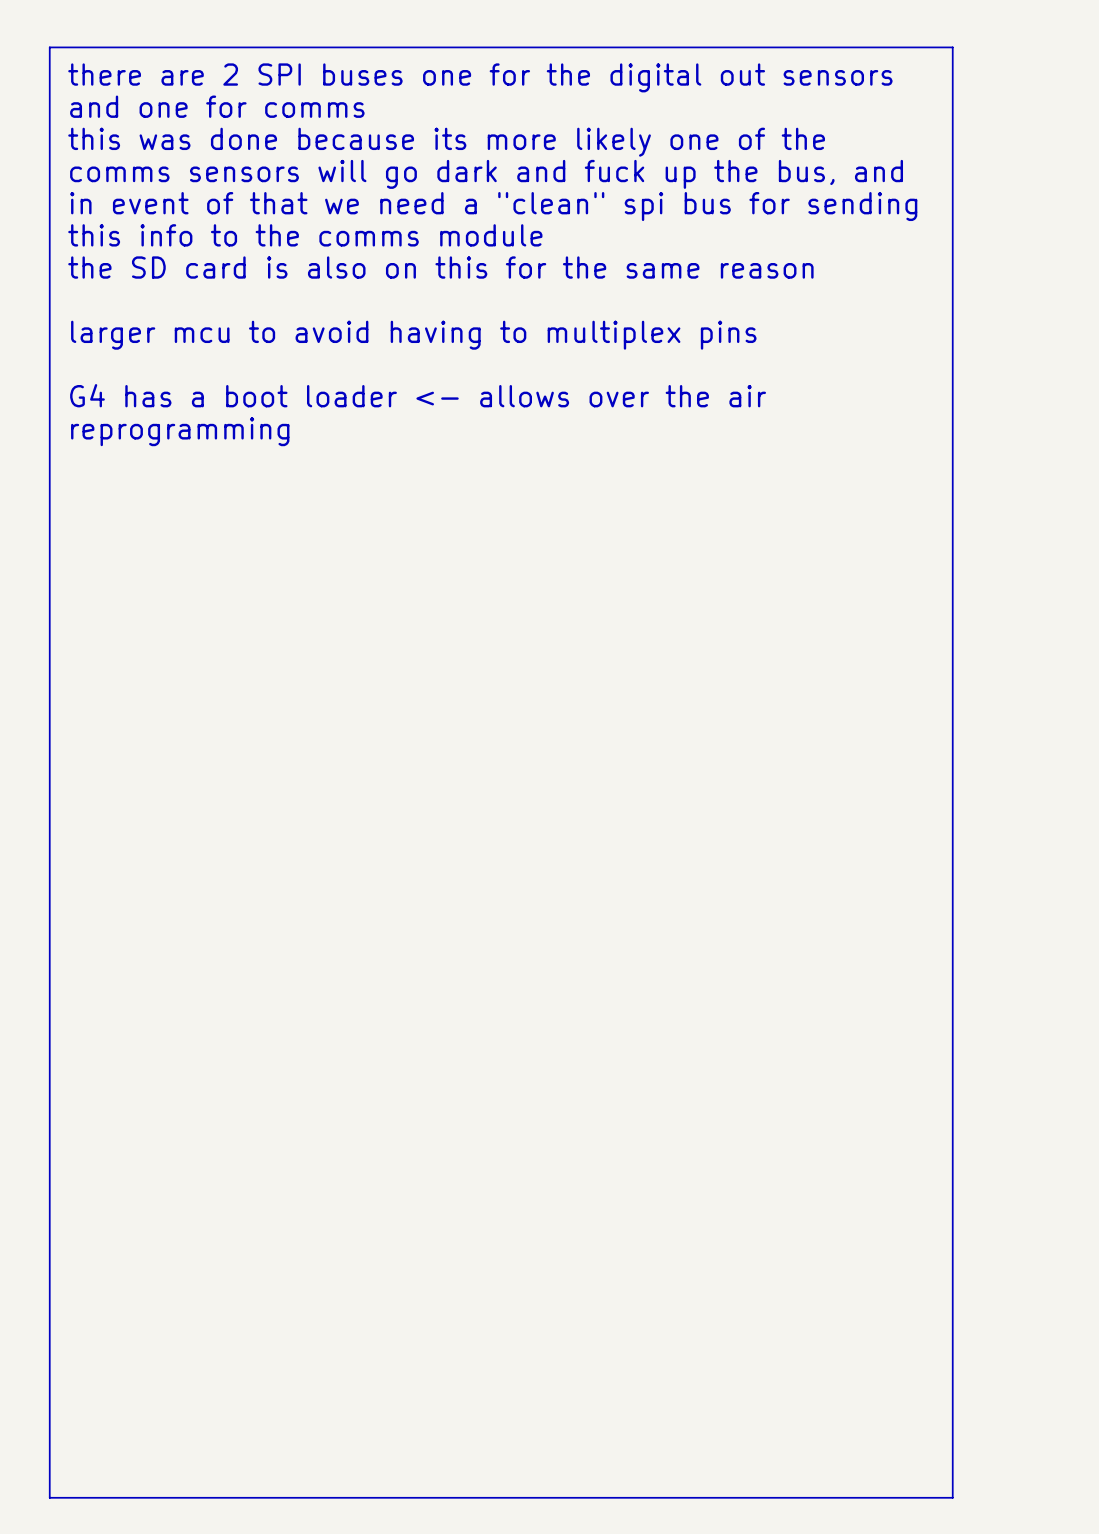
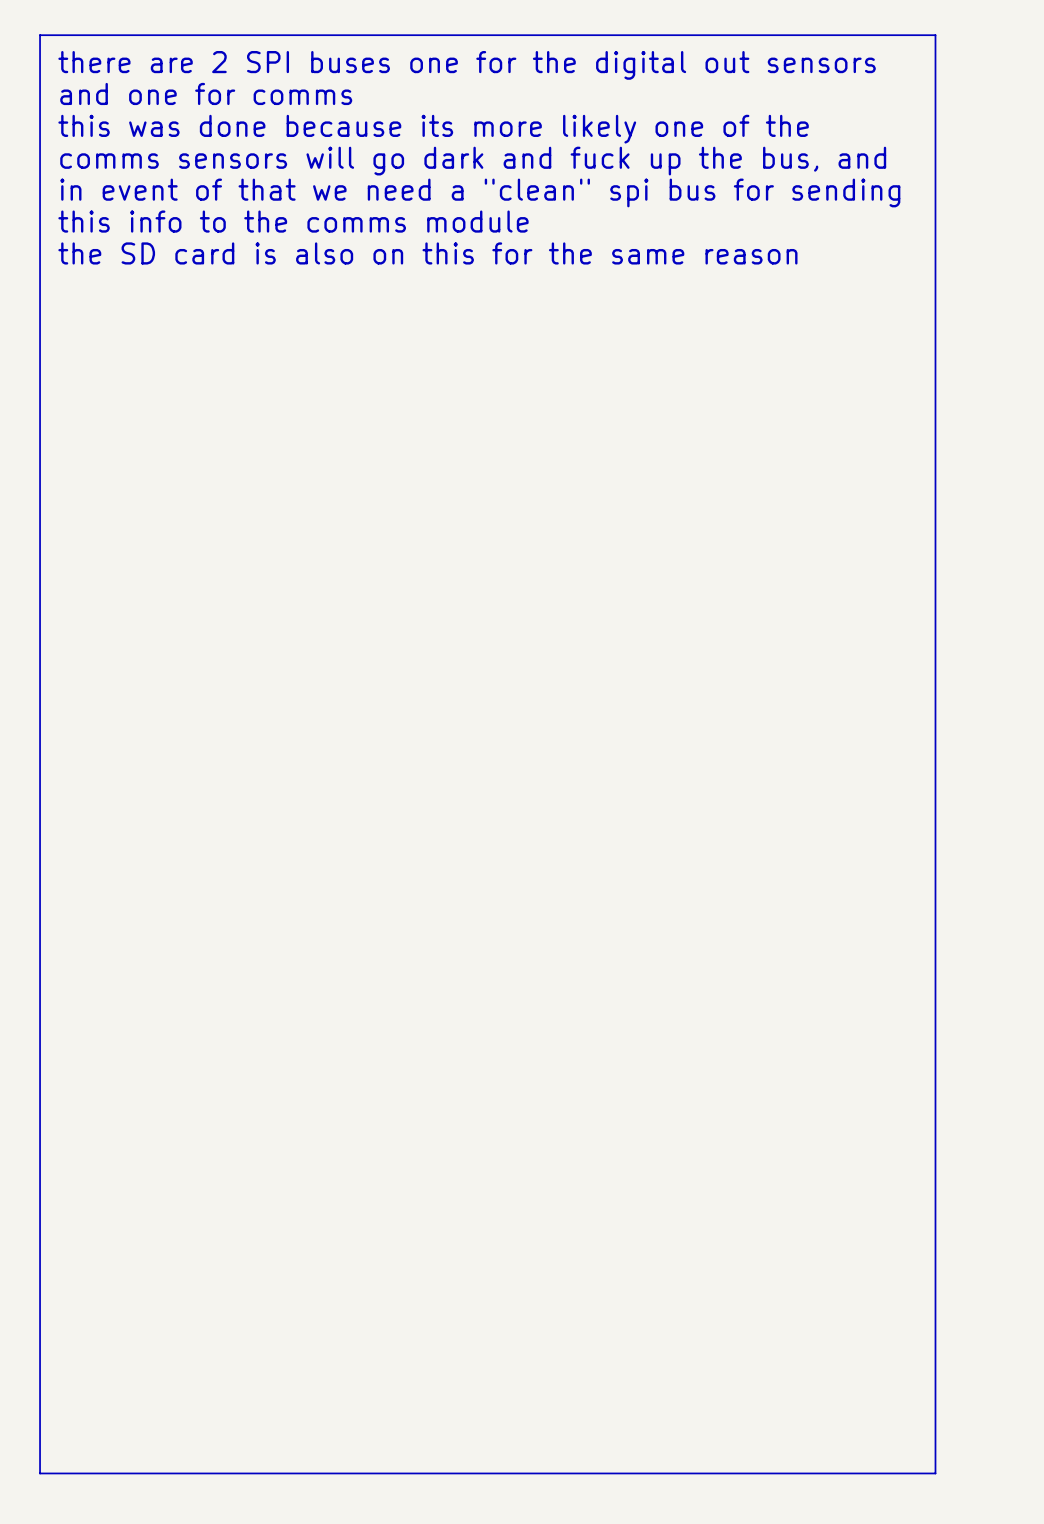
text: larger mcu to avoid having to multiplex pins (413, 335) -> none
text: G4 has a boot loader <- allows over the air (418, 395) -> none
text: reprogramming (180, 431) -> none

